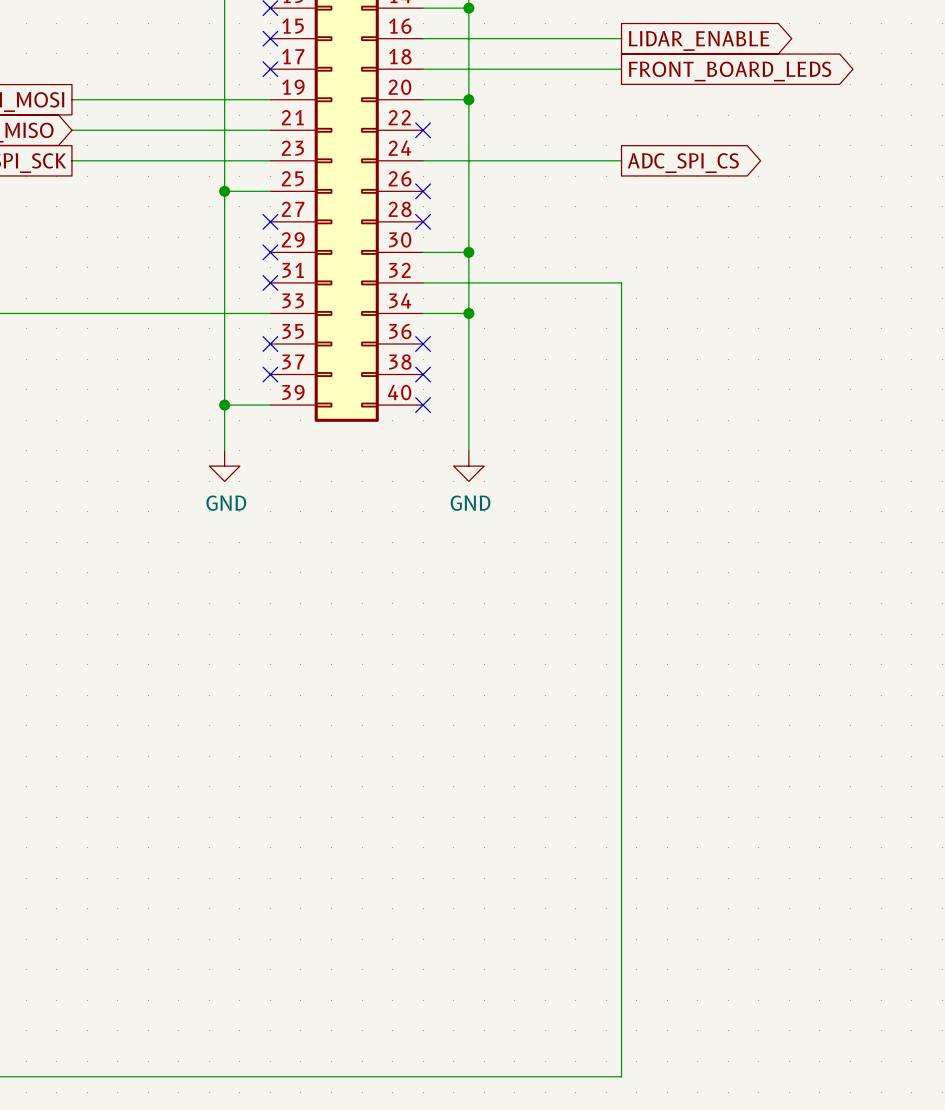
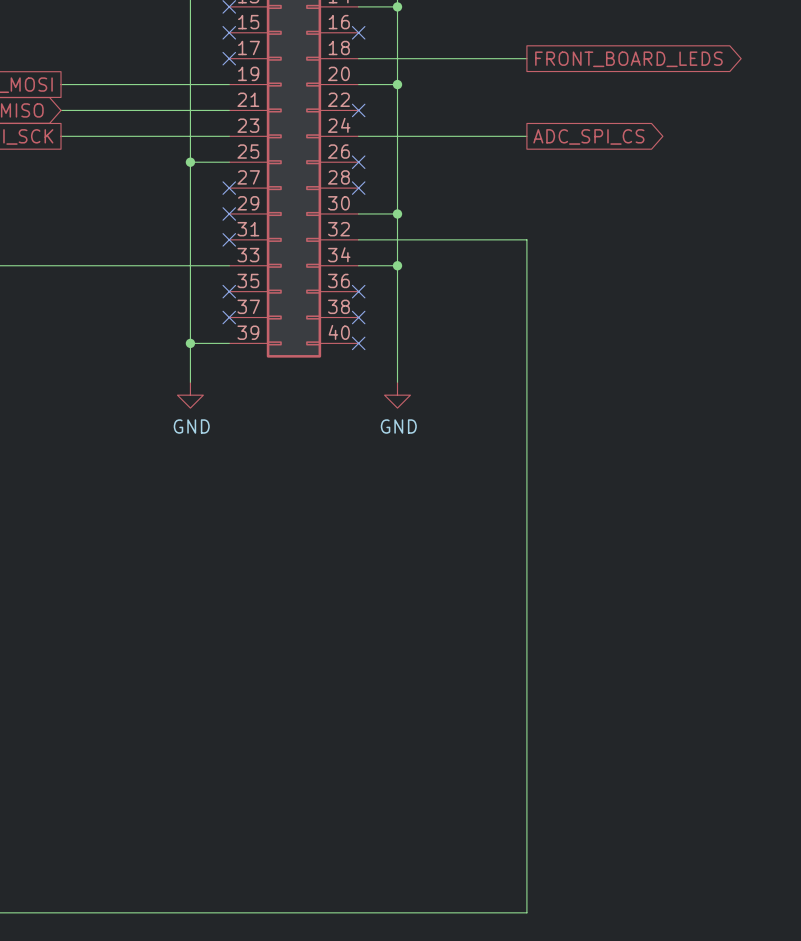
wire: (423, 38) (621, 38) -> none
no-connect mark: none -> (358, 32)
global label: LIDAR_ENABLE (699, 40) -> none

